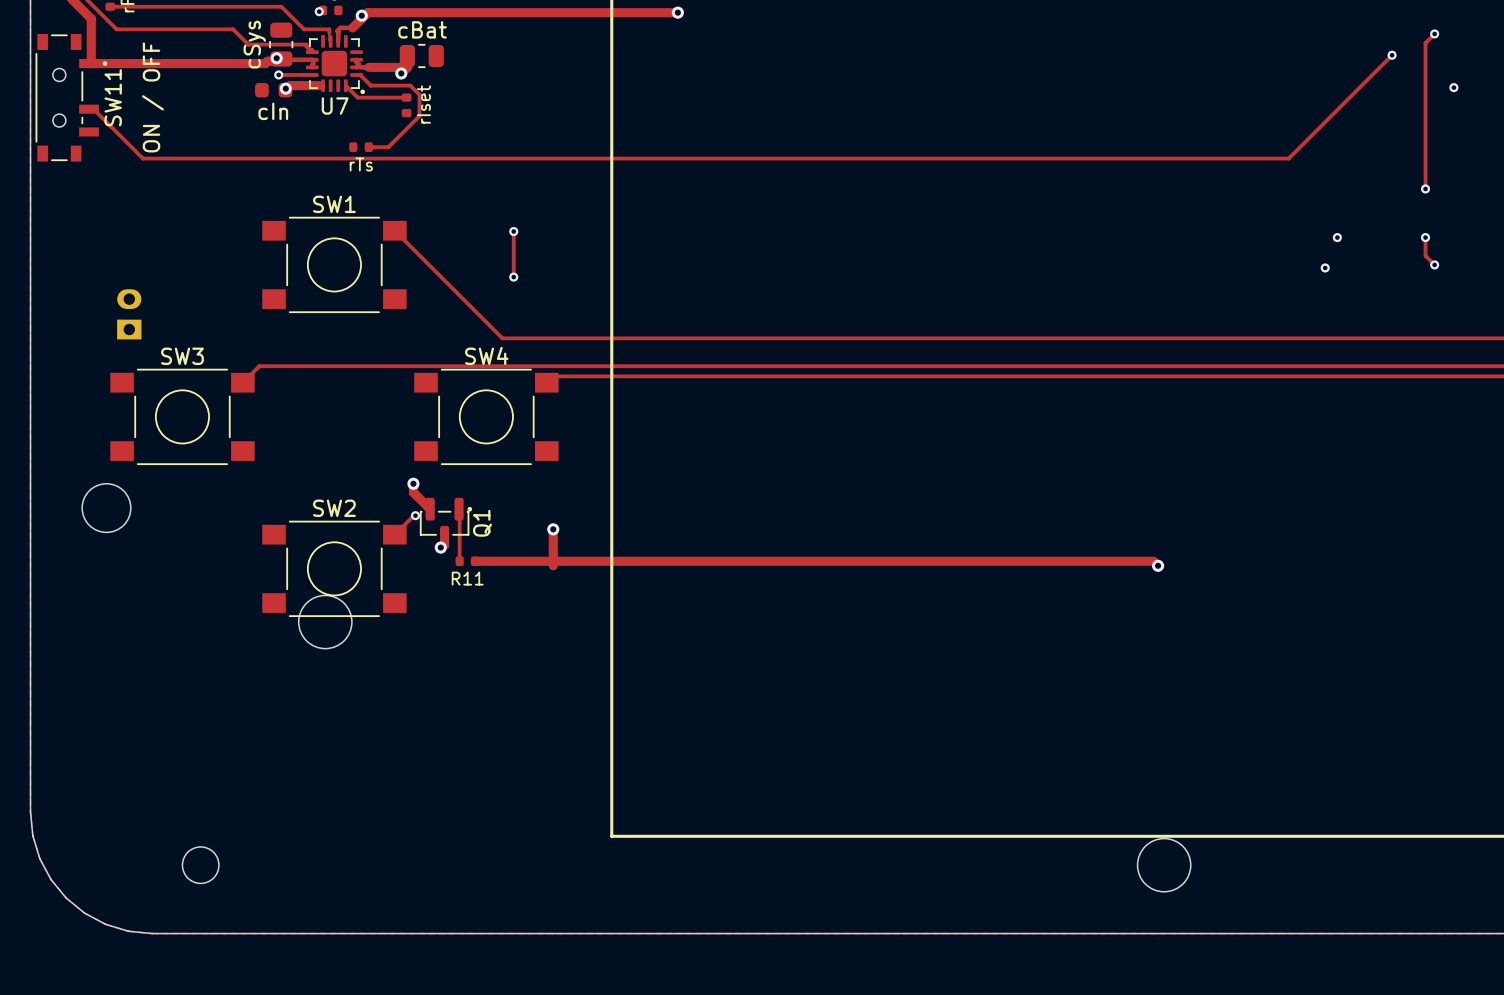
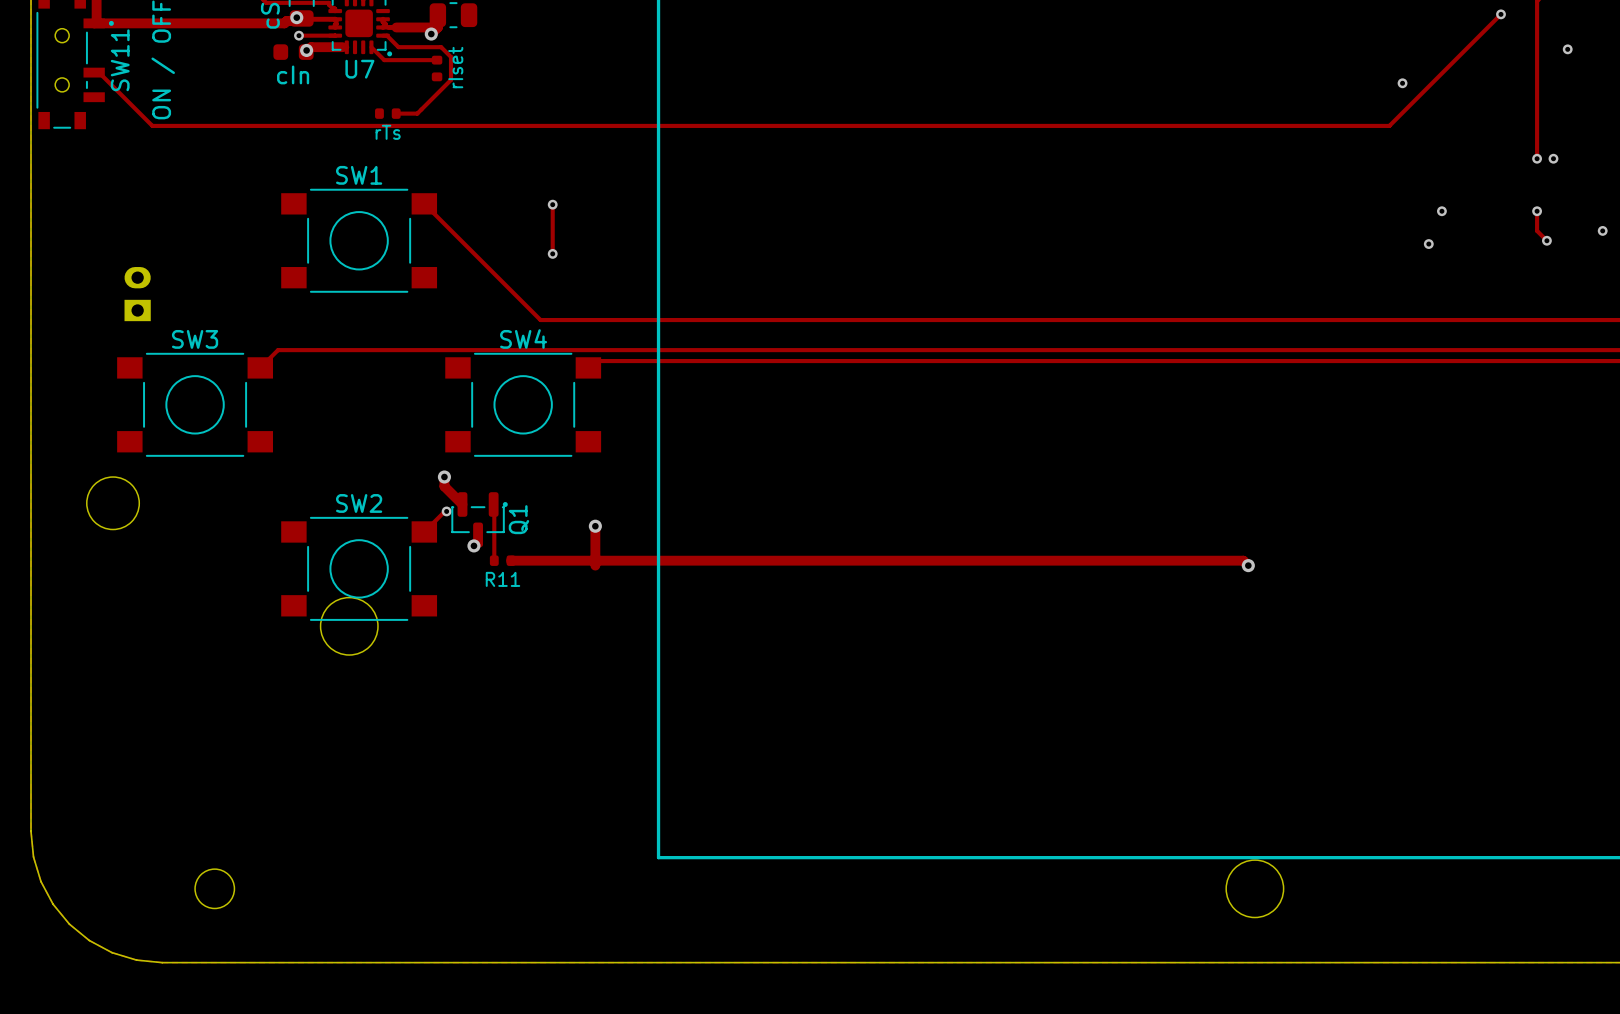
via: none -> (1402, 83)
via: none -> (1553, 158)
via: none -> (1602, 230)

